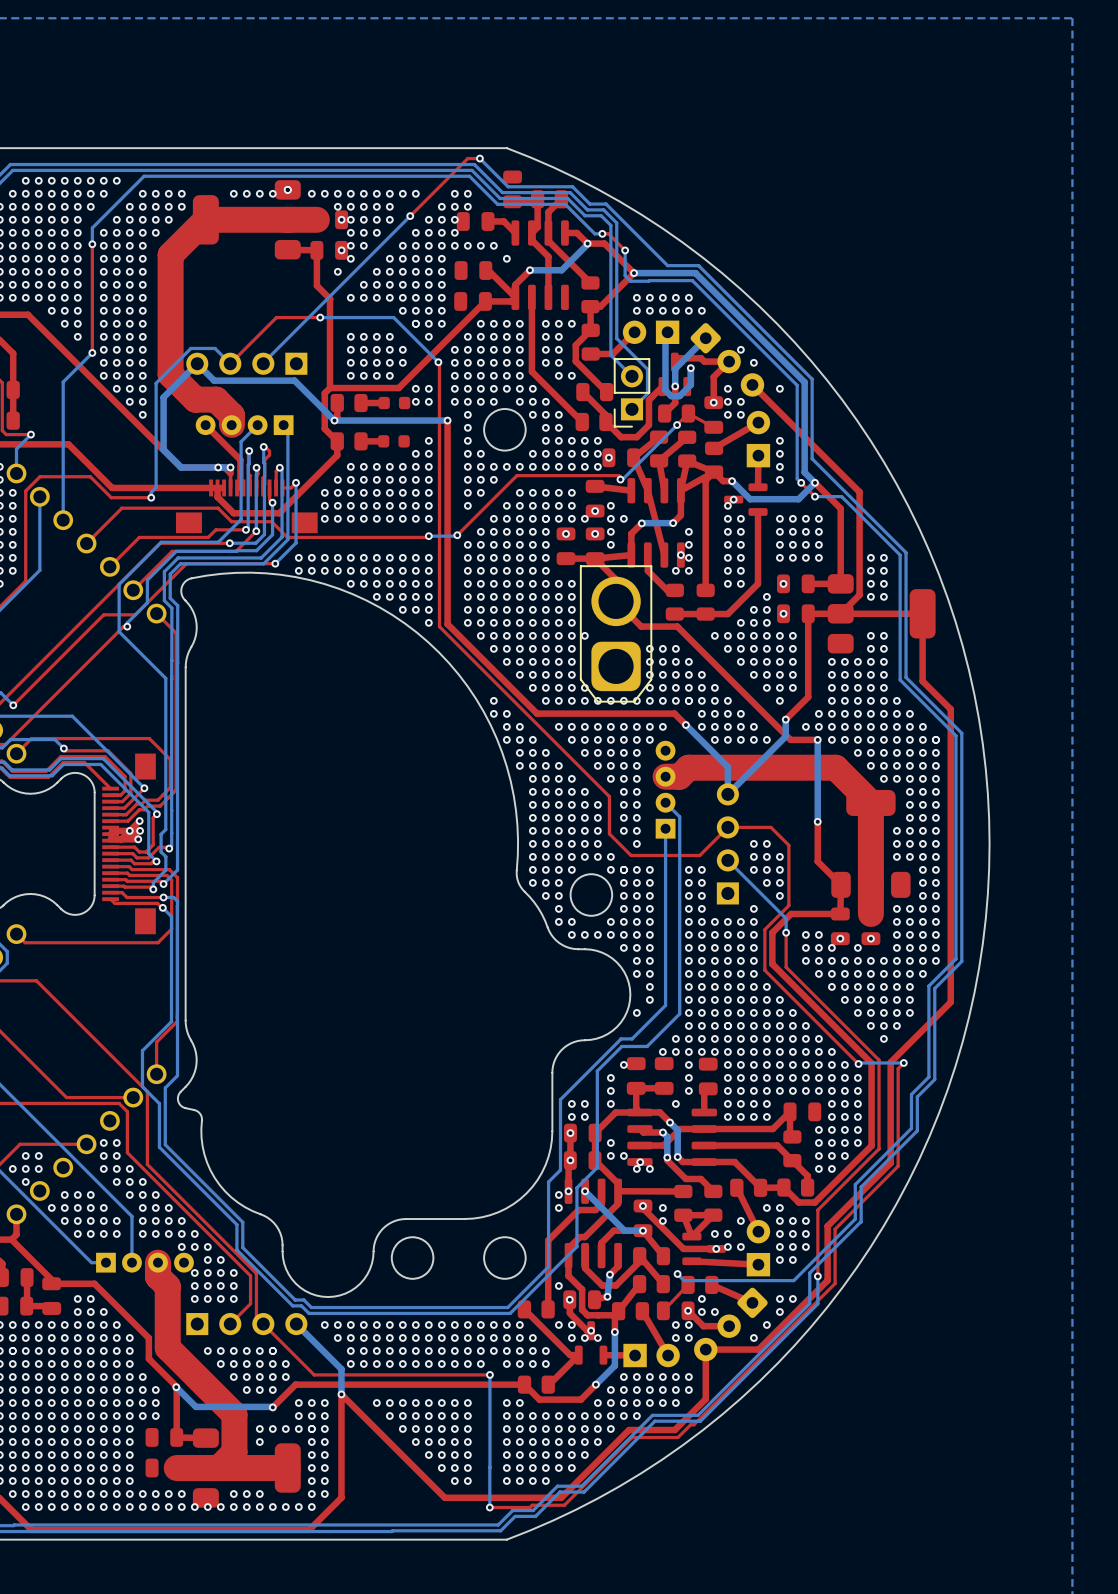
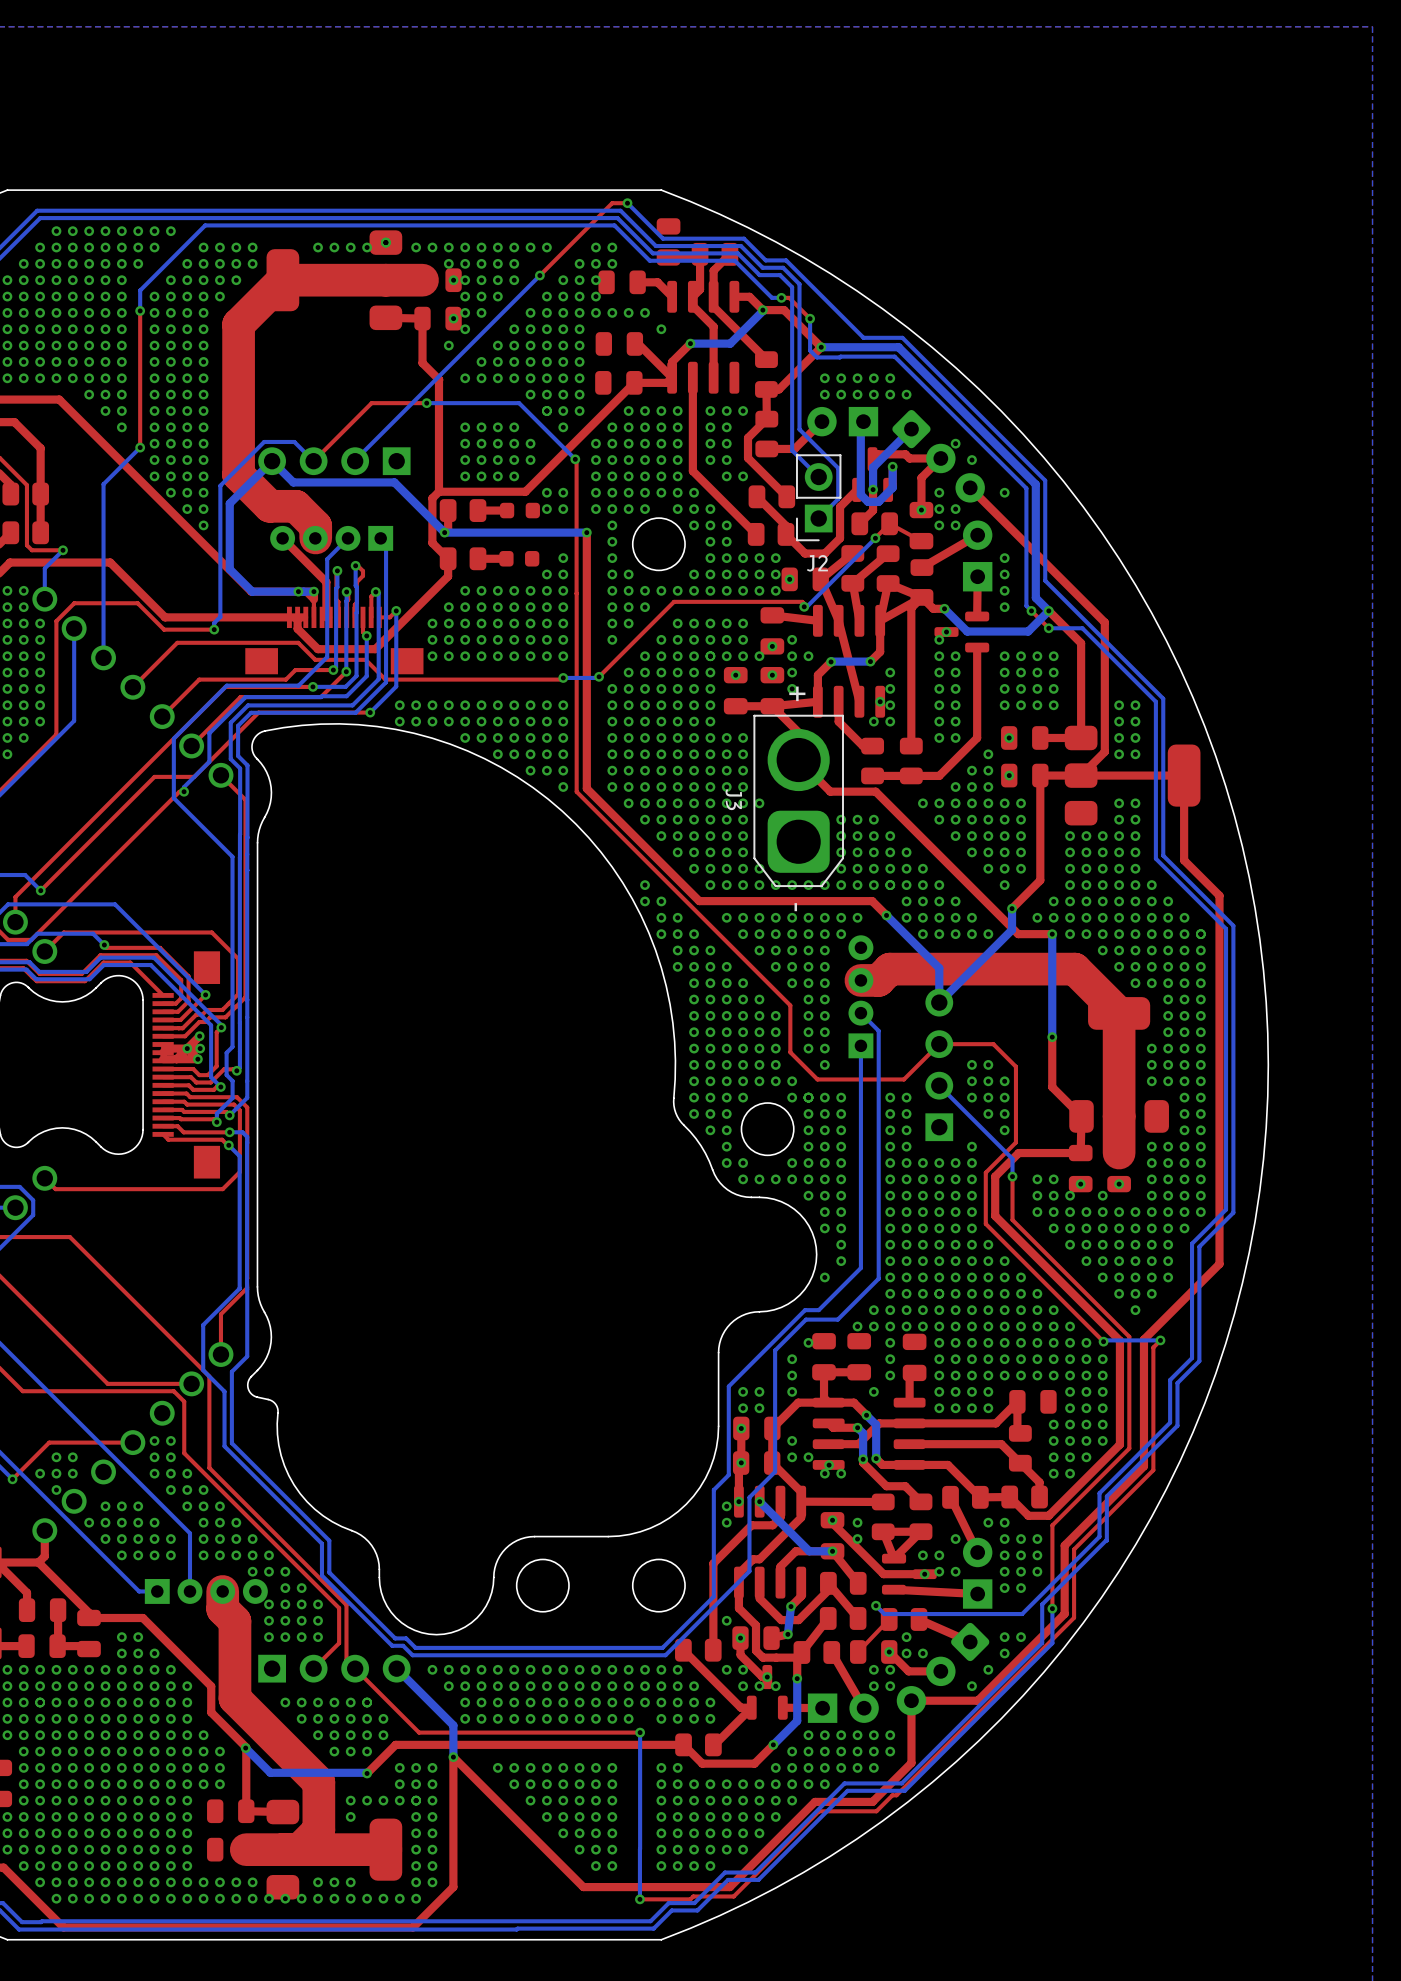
J2 name: none -> J2 (817, 563)
J3 text: none -> + (797, 693)
J3 name: none -> J3 (733, 799)
J3 text: none -> - (795, 907)

